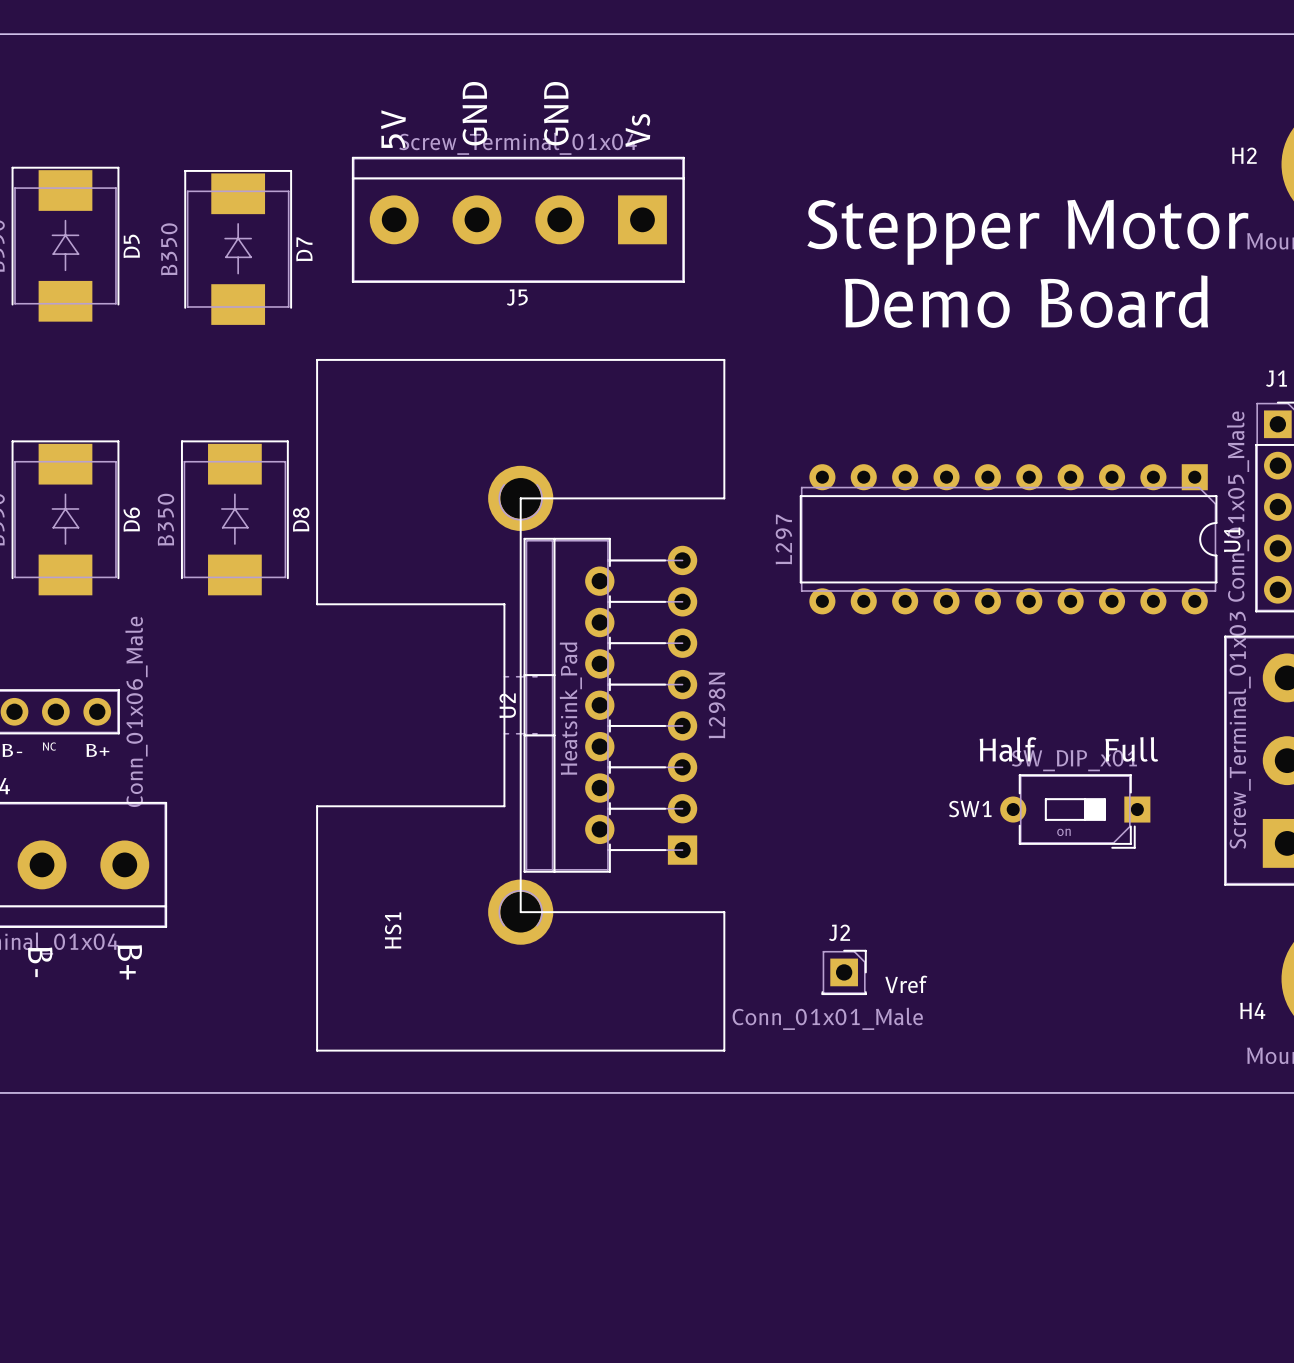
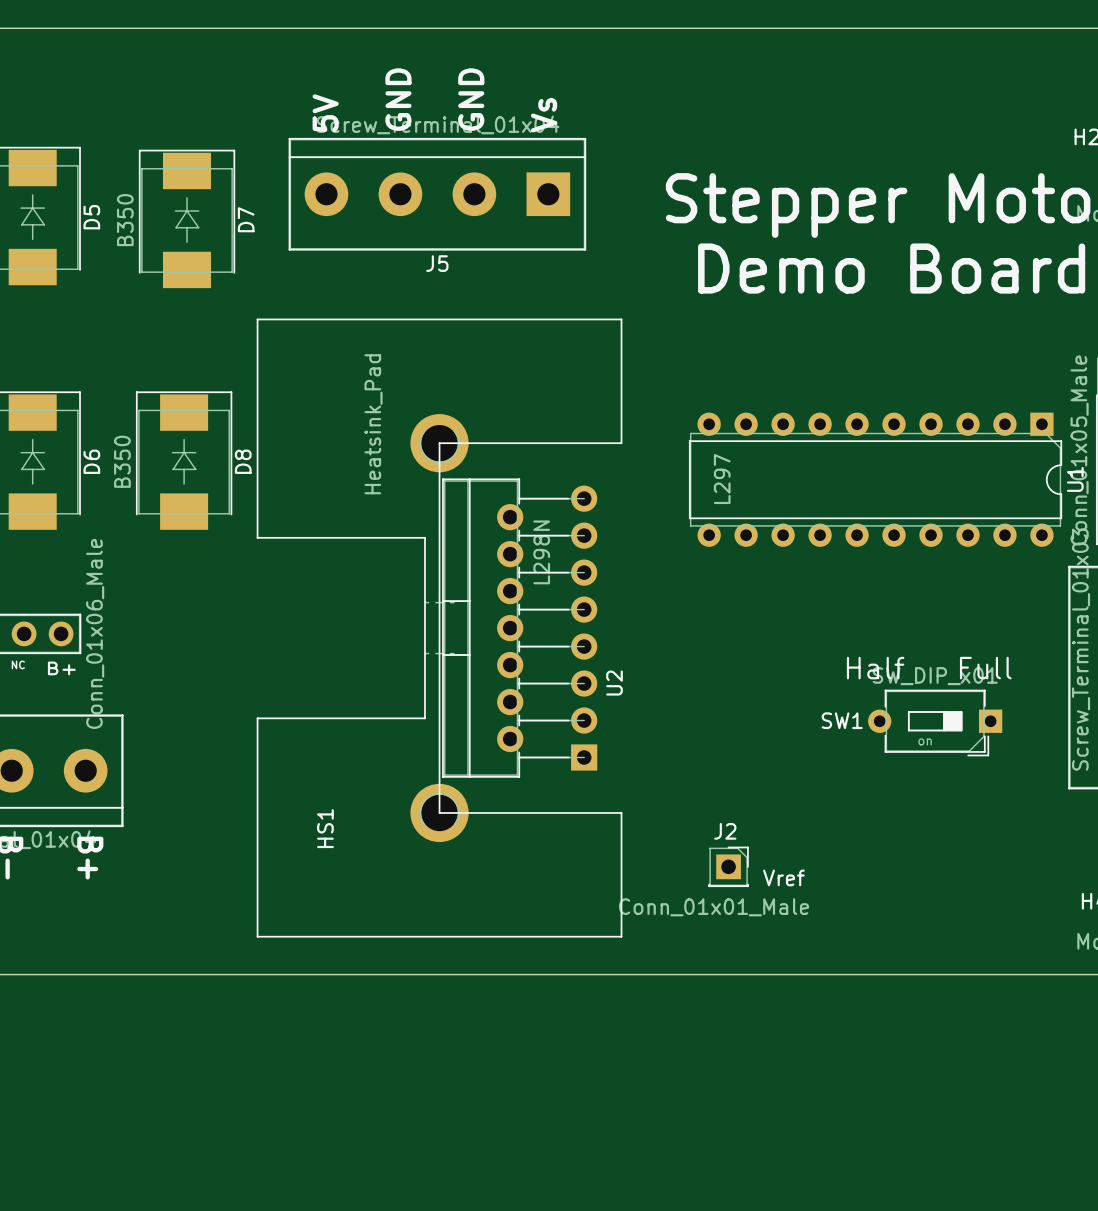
U1 value position: L297 (783, 539) -> L297 (722, 479)
U2 name position: U2 (507, 705) -> U2 (614, 683)
U2 value position: L298N (717, 705) -> L298N (541, 552)
HS1 value position: Heatsink_Pad (570, 708) -> Heatsink_Pad (373, 424)

